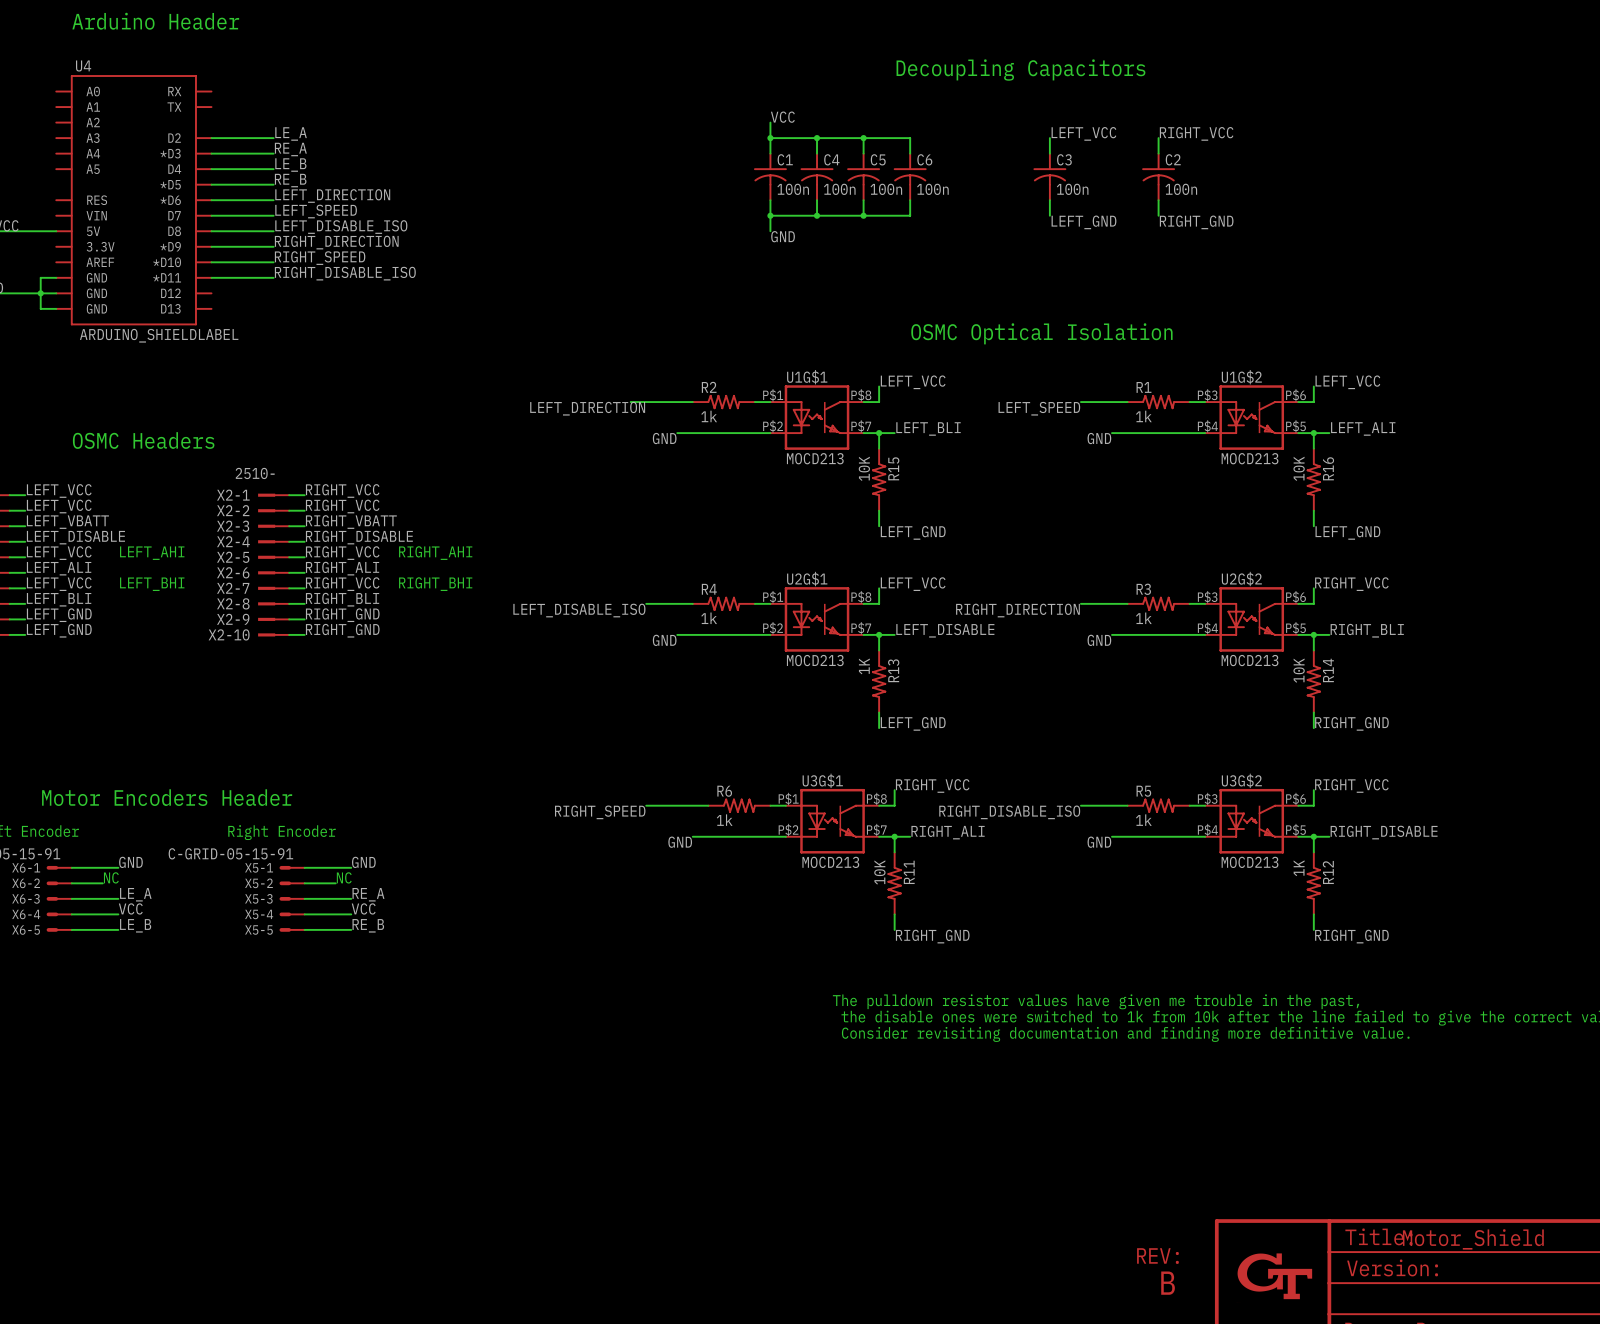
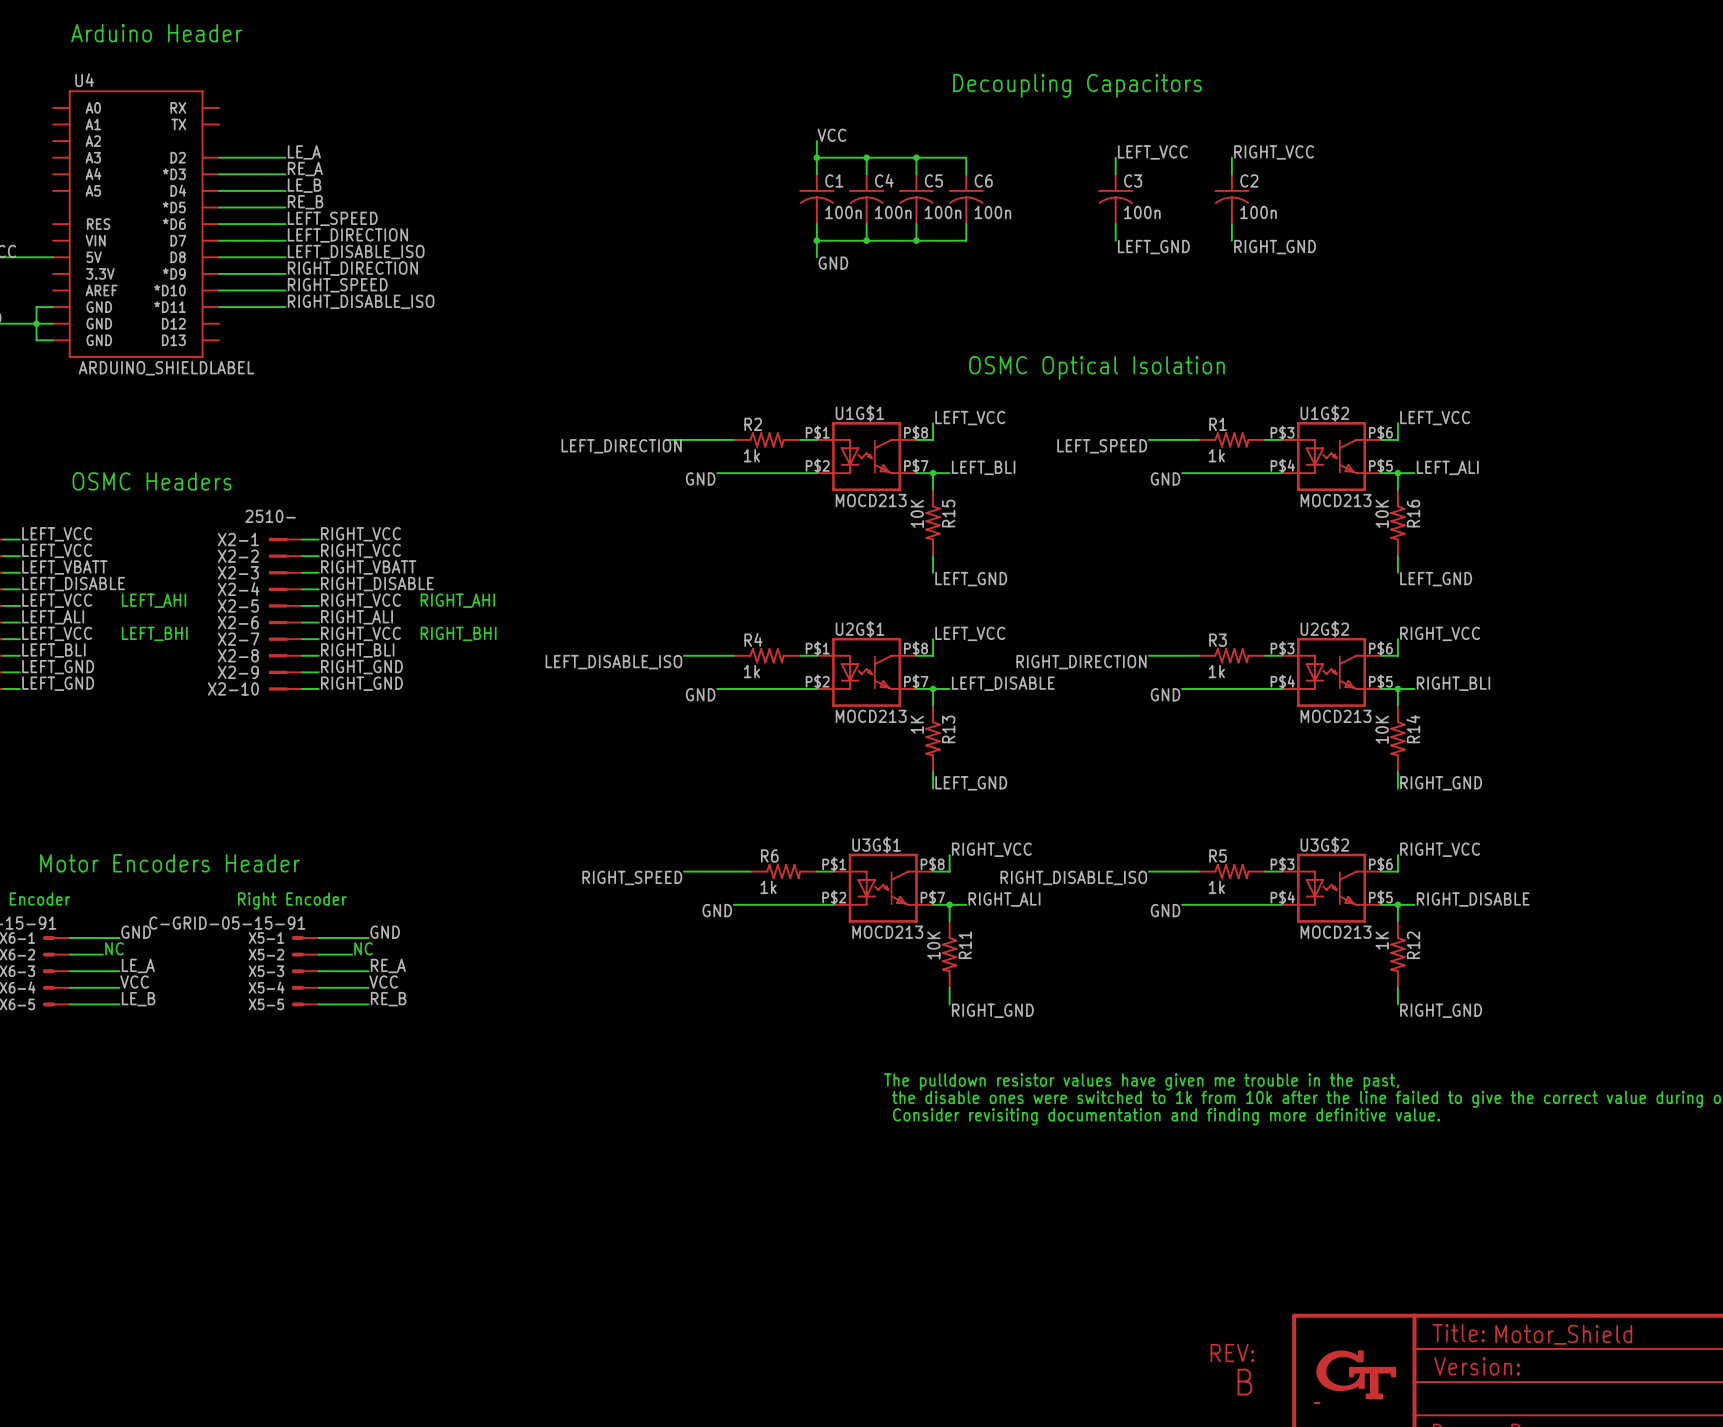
label: LEFT_DIRECTION (332, 195) -> LEFT_SPEED (332, 218)
label: LEFT_SPEED (316, 211) -> LEFT_DIRECTION (347, 235)

